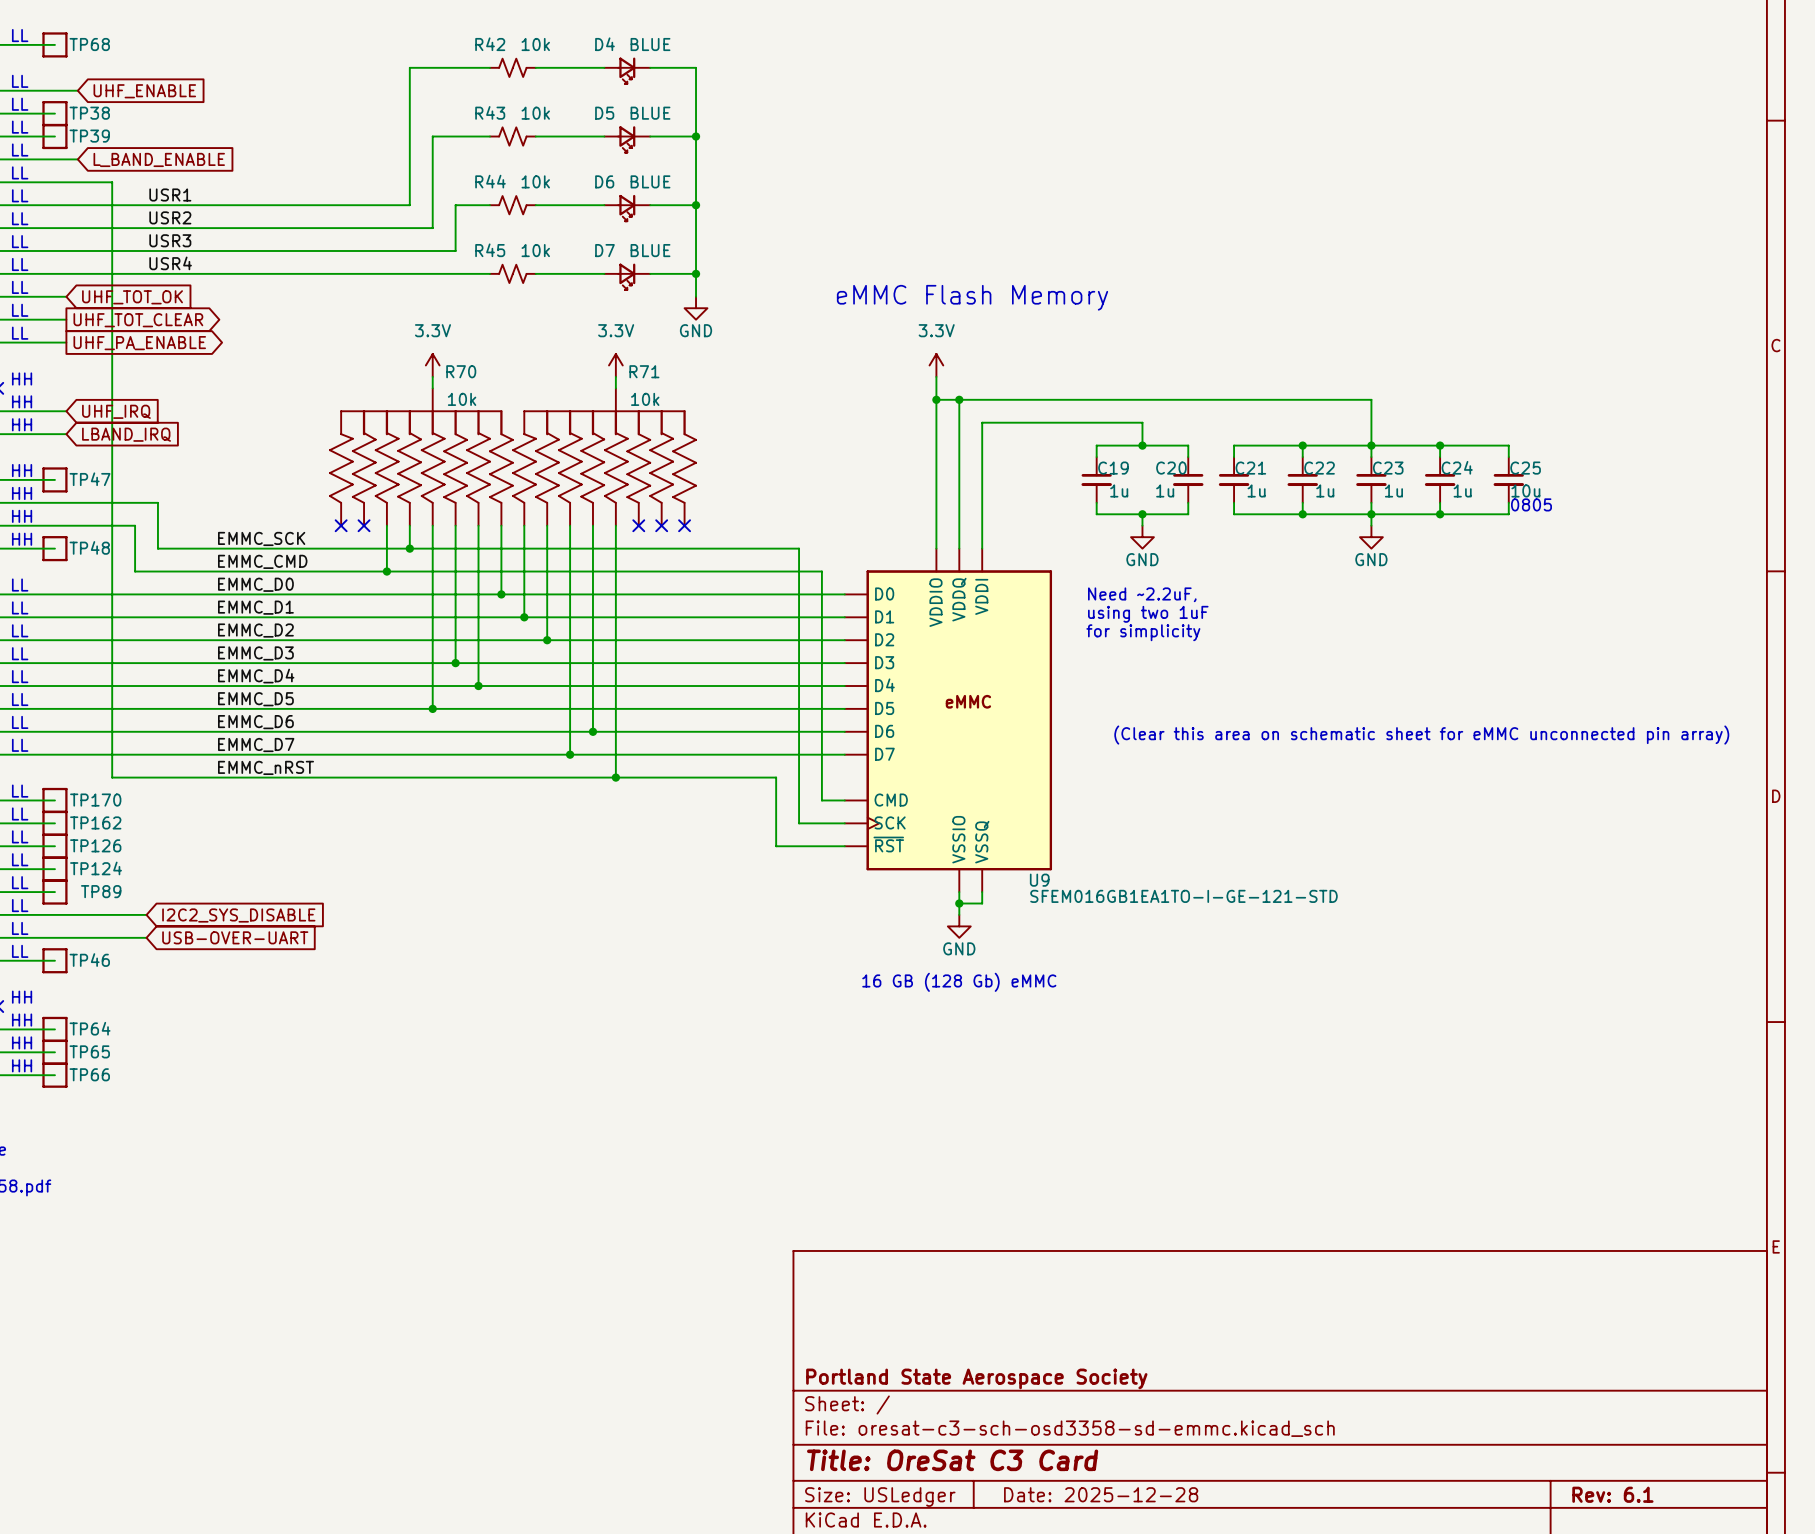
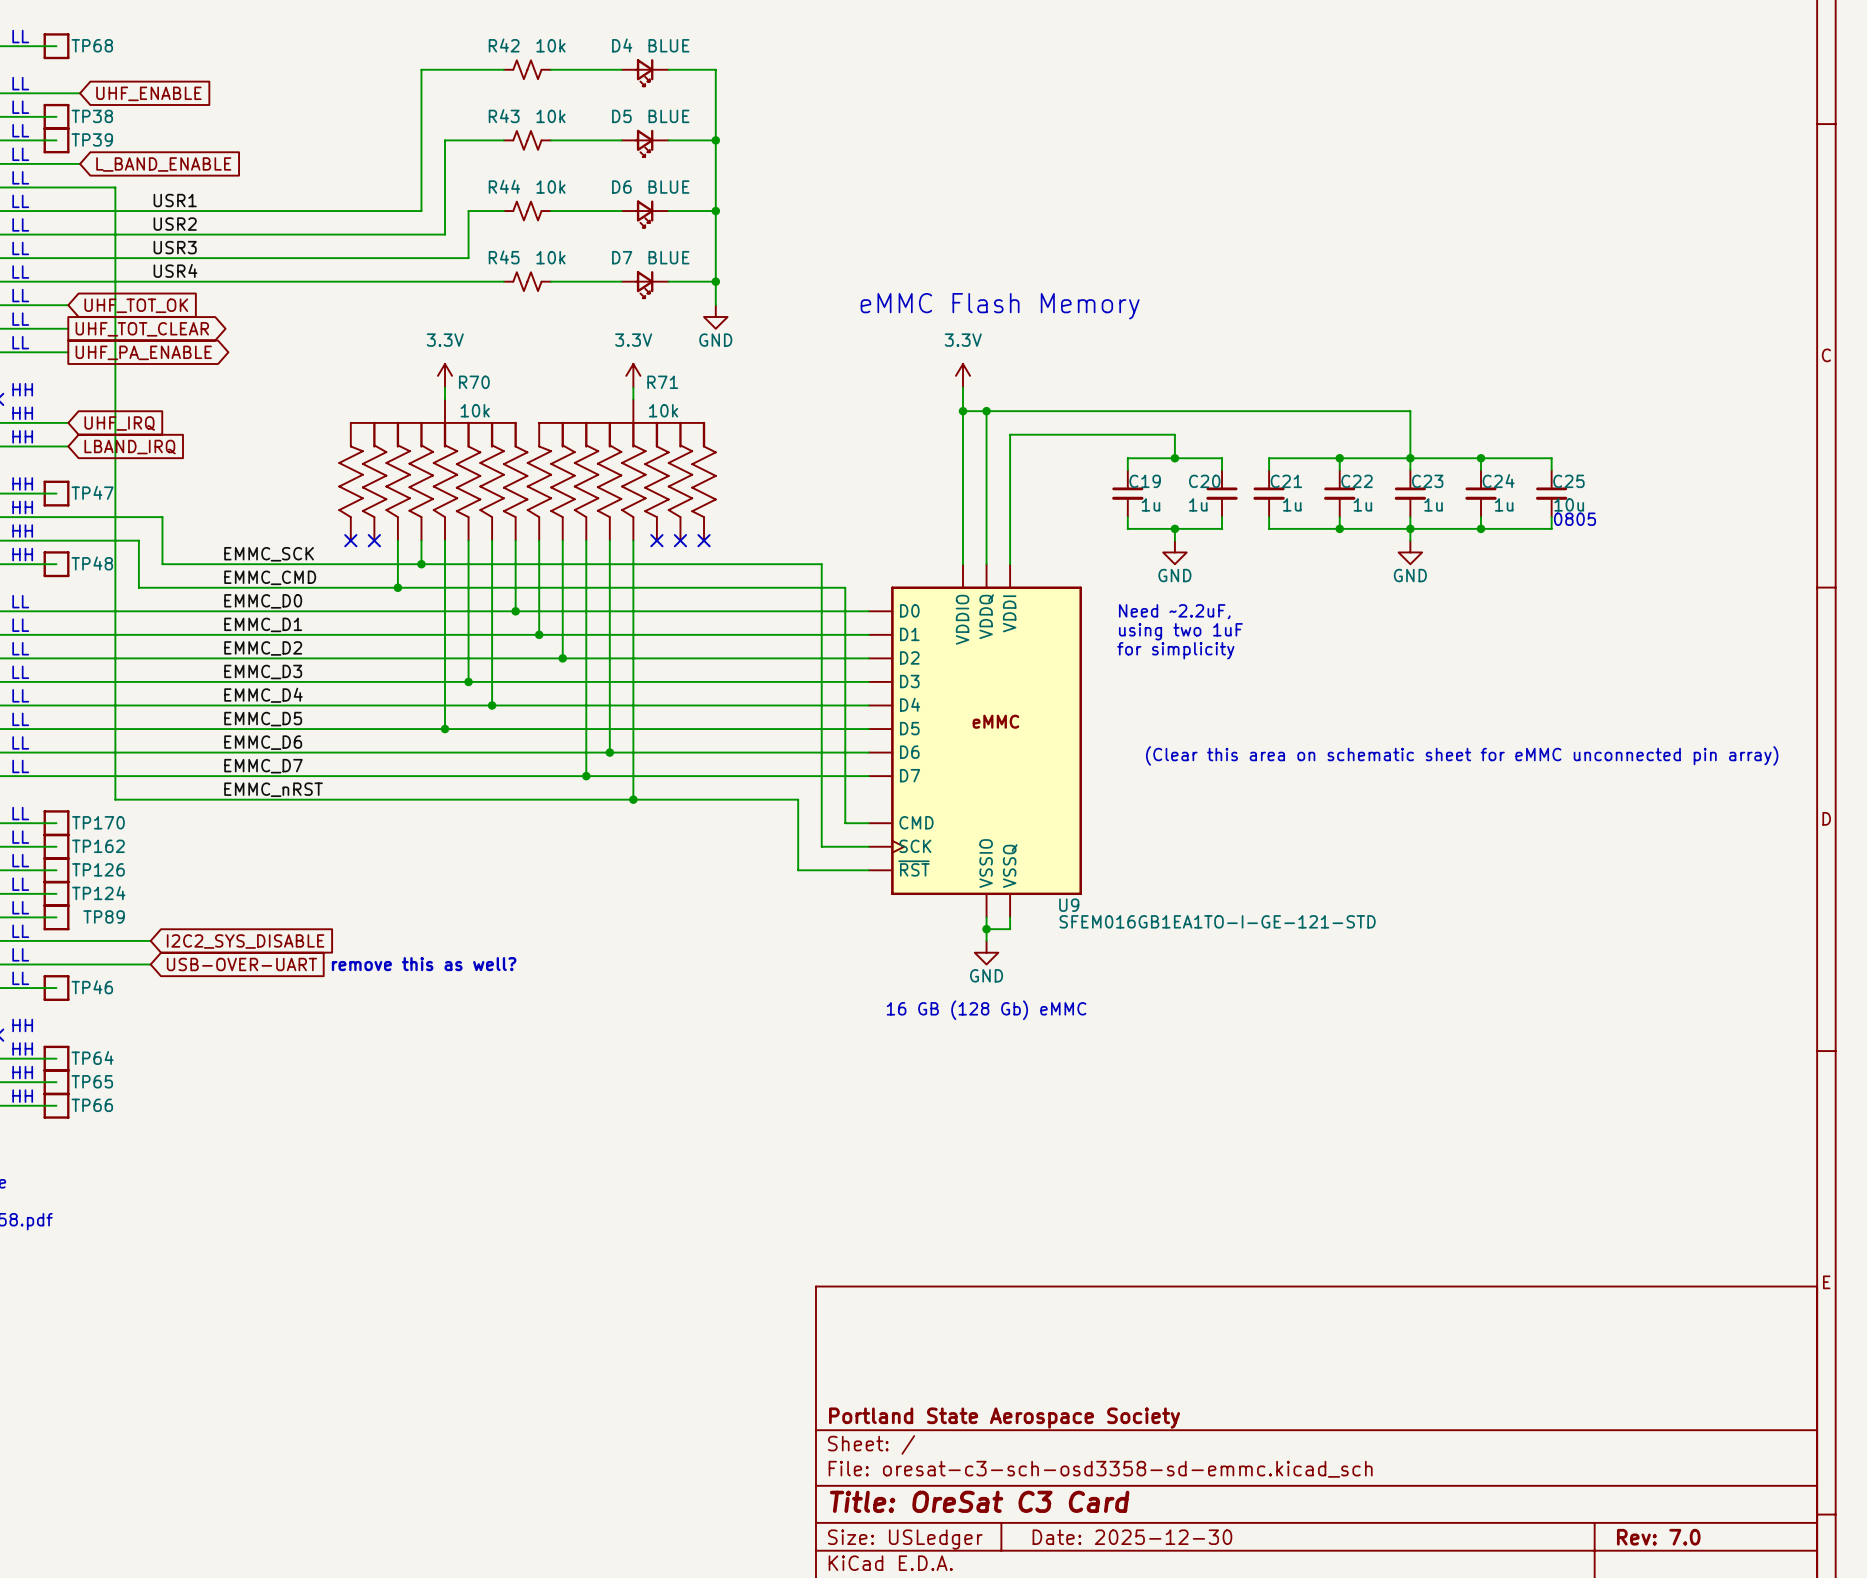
text: none -> remove this as well? (424, 964)
title block: Date: 2025-12-28 (1101, 1494) -> Date: 2025-12-30 (1132, 1537)
title block: Rev: 6.1 (1612, 1494) -> Rev: 7.0 (1658, 1537)

